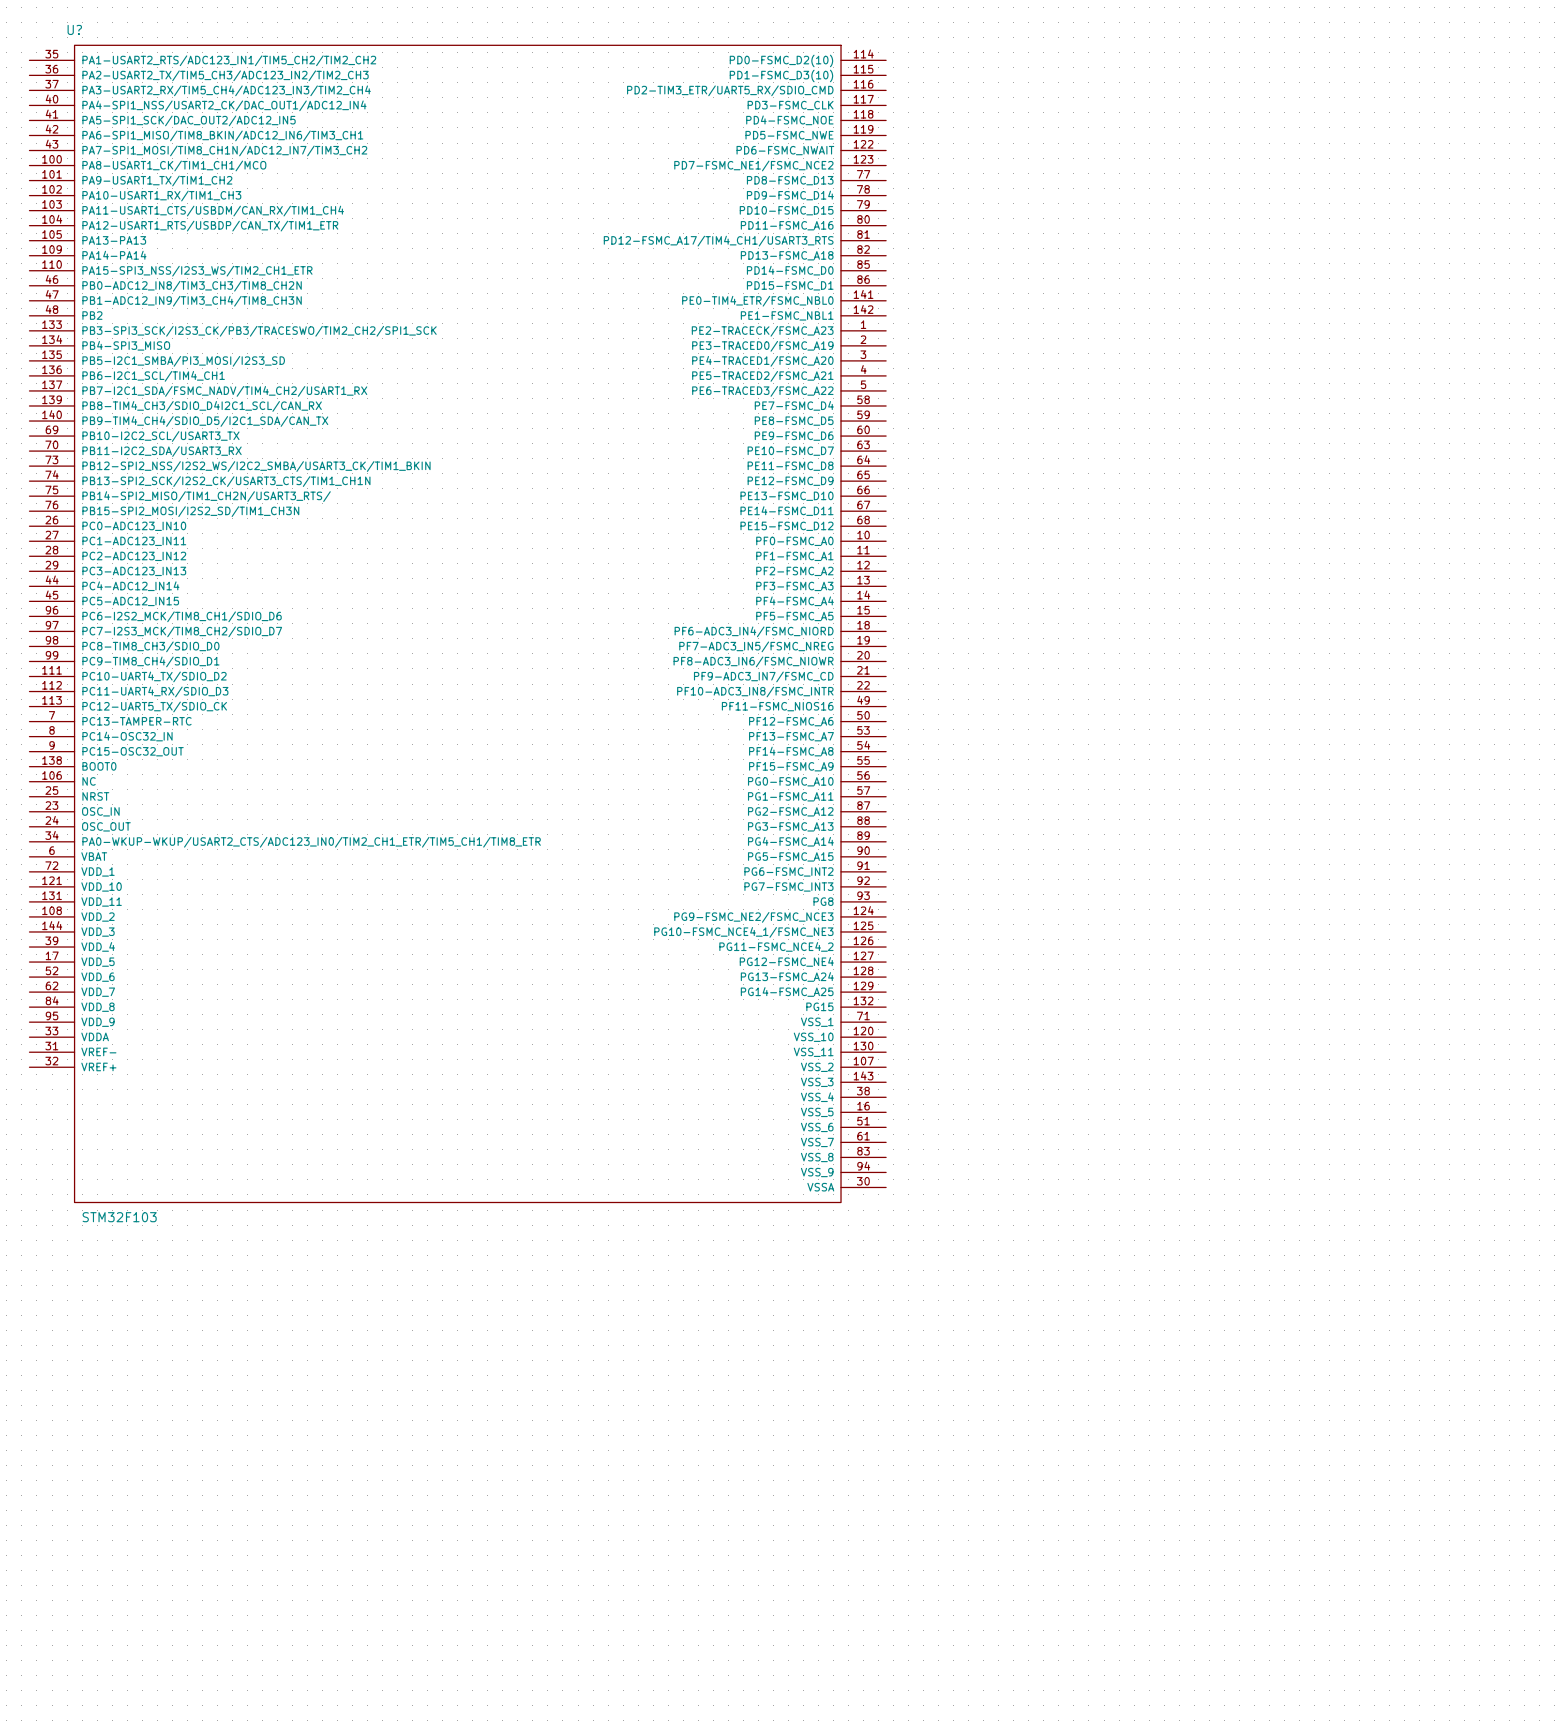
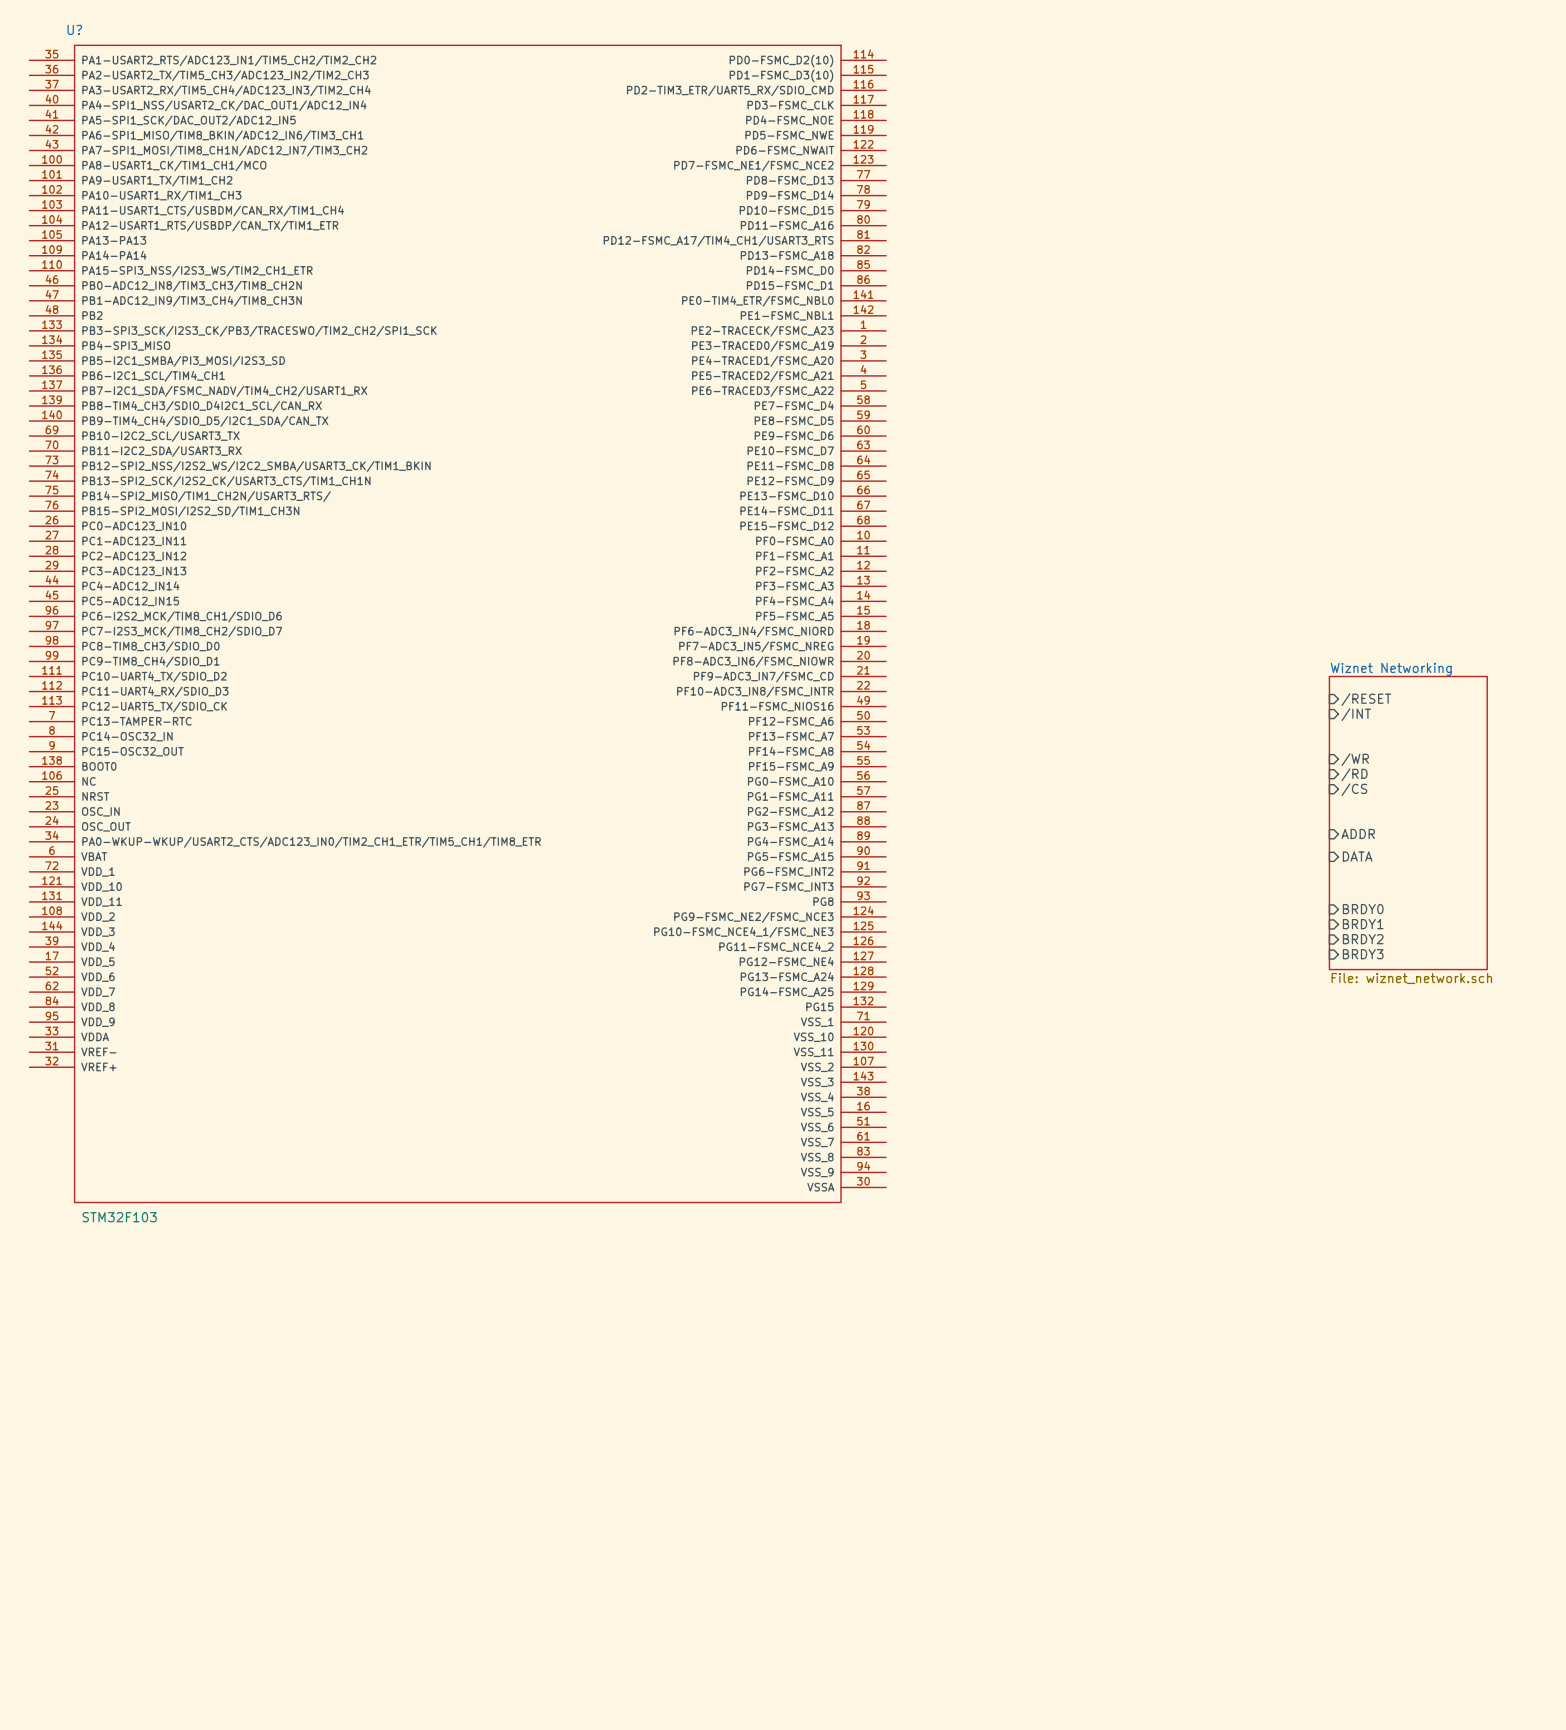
sheet pin: none -> /RESET (1366, 699)
sheet pin: none -> /INT (1356, 714)
sheet pin: none -> /WR (1355, 759)
sheet pin: none -> /RD (1354, 774)
sheet pin: none -> /CS (1354, 789)
sheet Wiznet Networking: none -> File: wiznet_network.sch (1408, 823)
sheet pin: none -> ADDR (1358, 833)
sheet pin: none -> DATA (1357, 856)
sheet pin: none -> BRDY0 (1363, 909)
sheet pin: none -> BRDY1 (1363, 924)
sheet pin: none -> BRDY2 (1363, 939)
sheet pin: none -> BRDY3 (1363, 954)

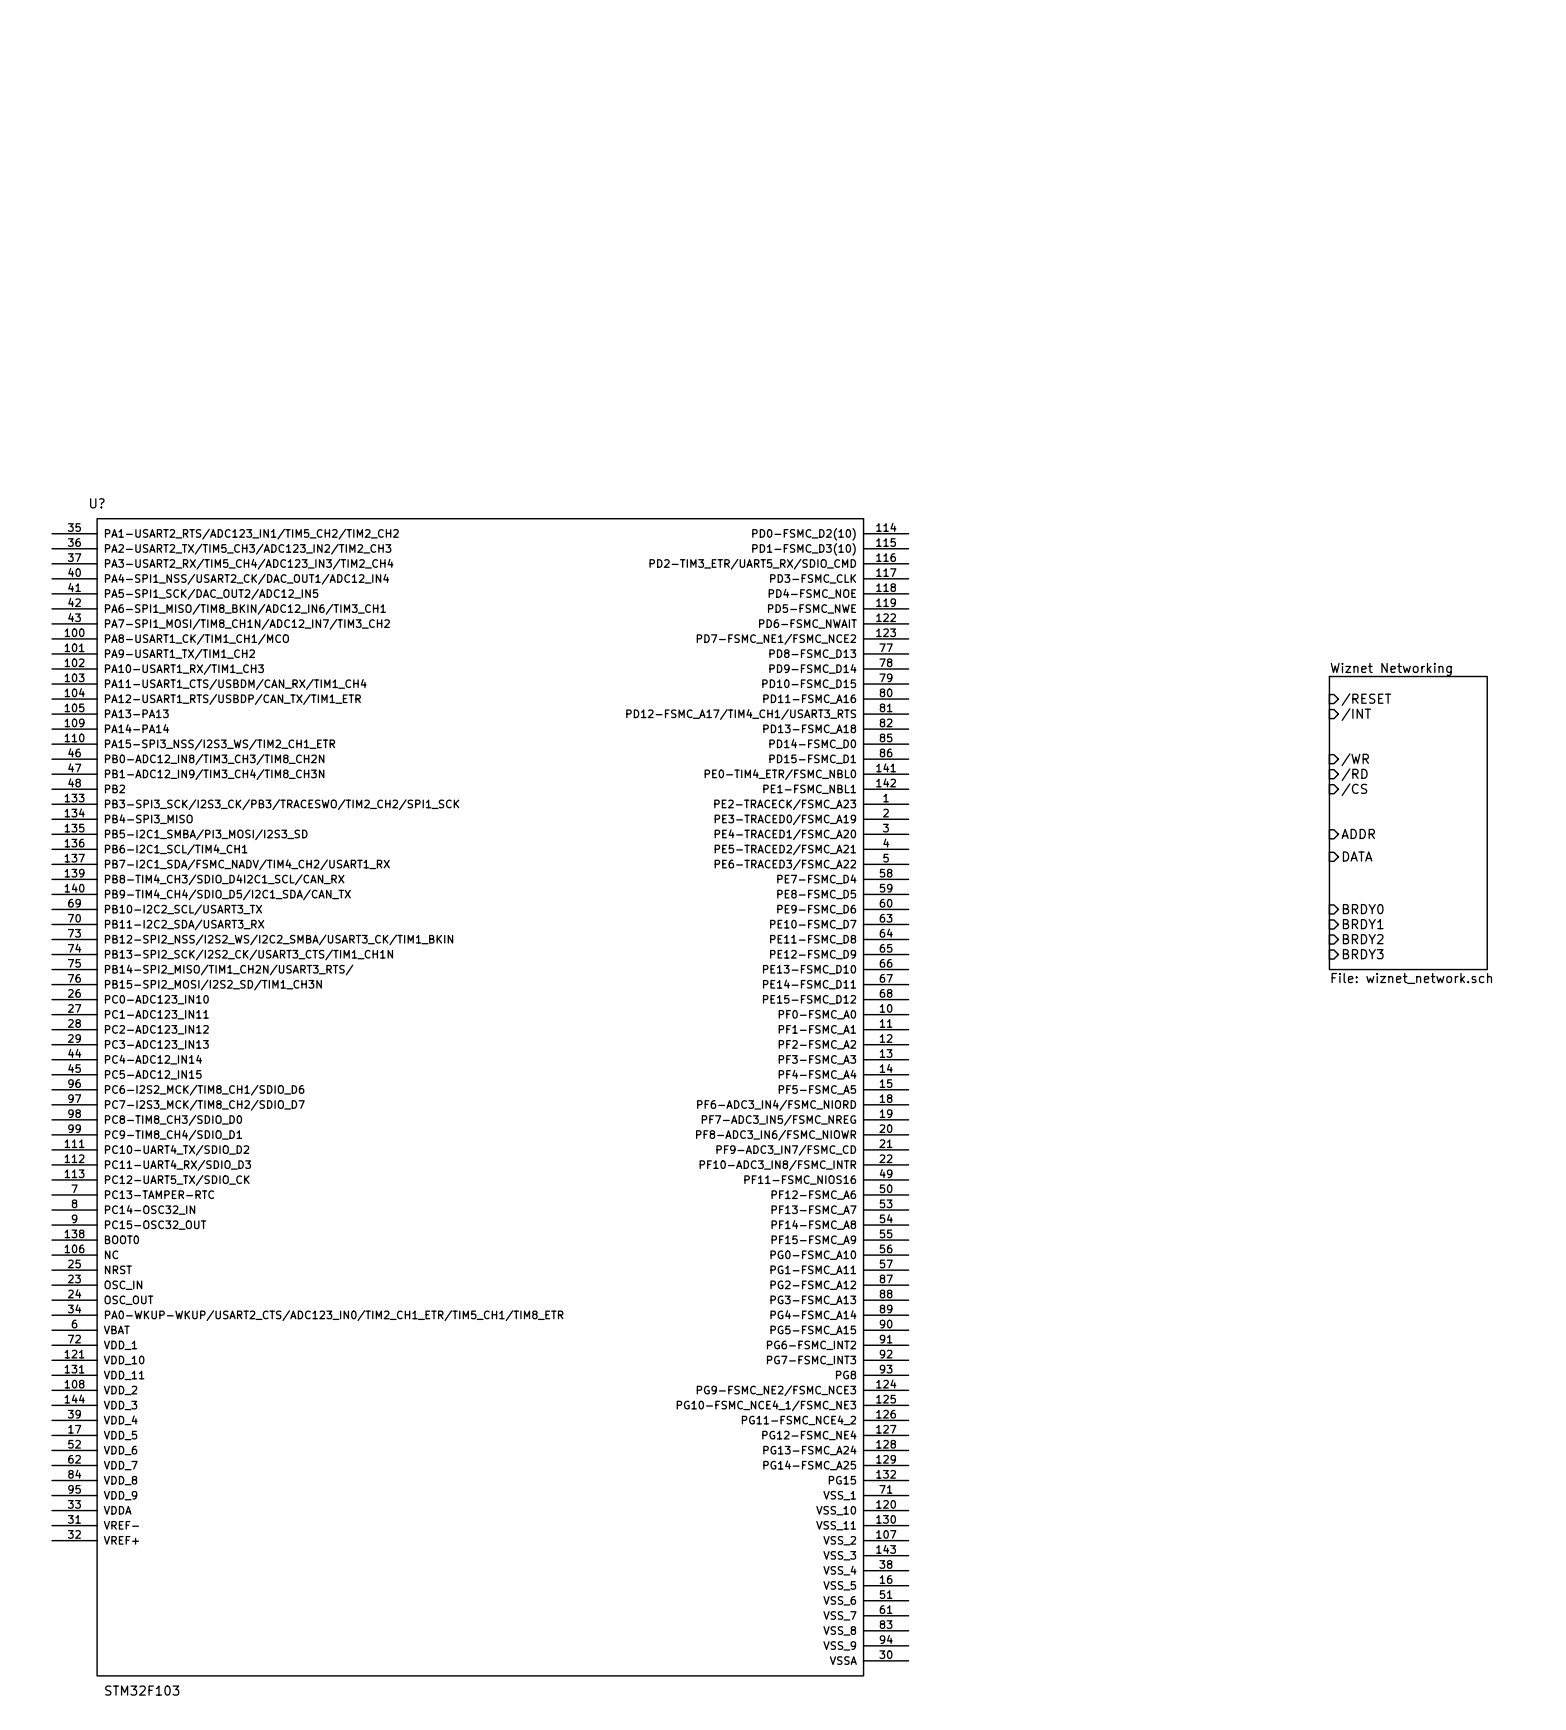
U?: STM32F103 (457, 623) -> none
U?: none -> STM32F103 (480, 1097)

